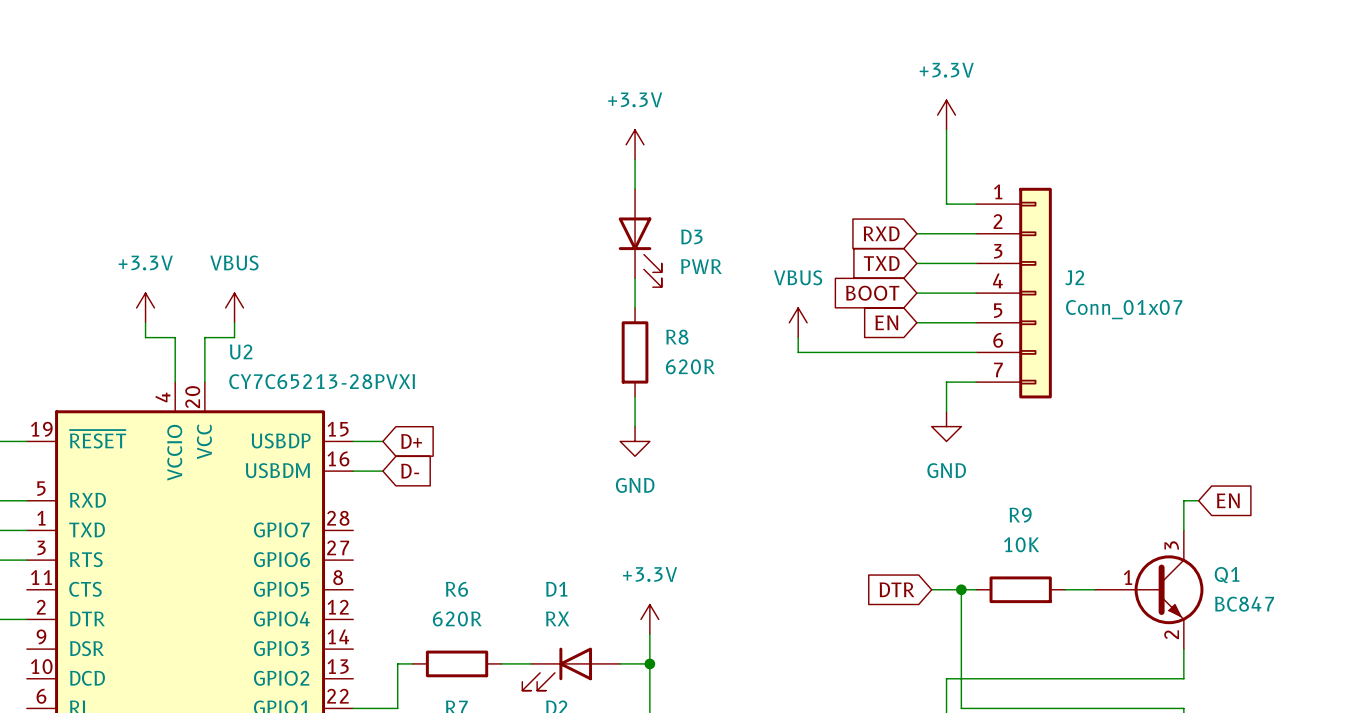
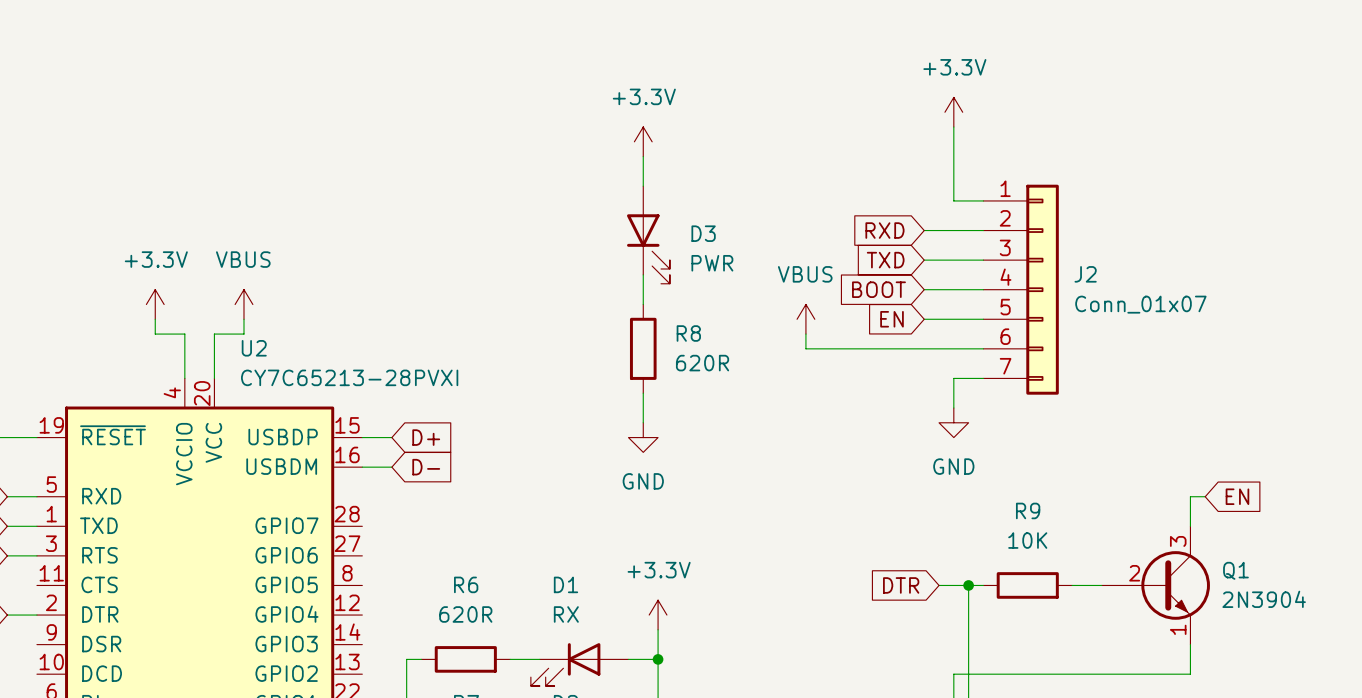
Q1 pin number: 1 (1127, 577) -> 2 (1134, 573)
Q1 value: BC847 (1244, 604) -> 2N3904 (1264, 599)
Q1 pin number: 2 (1171, 634) -> 1 (1178, 629)

